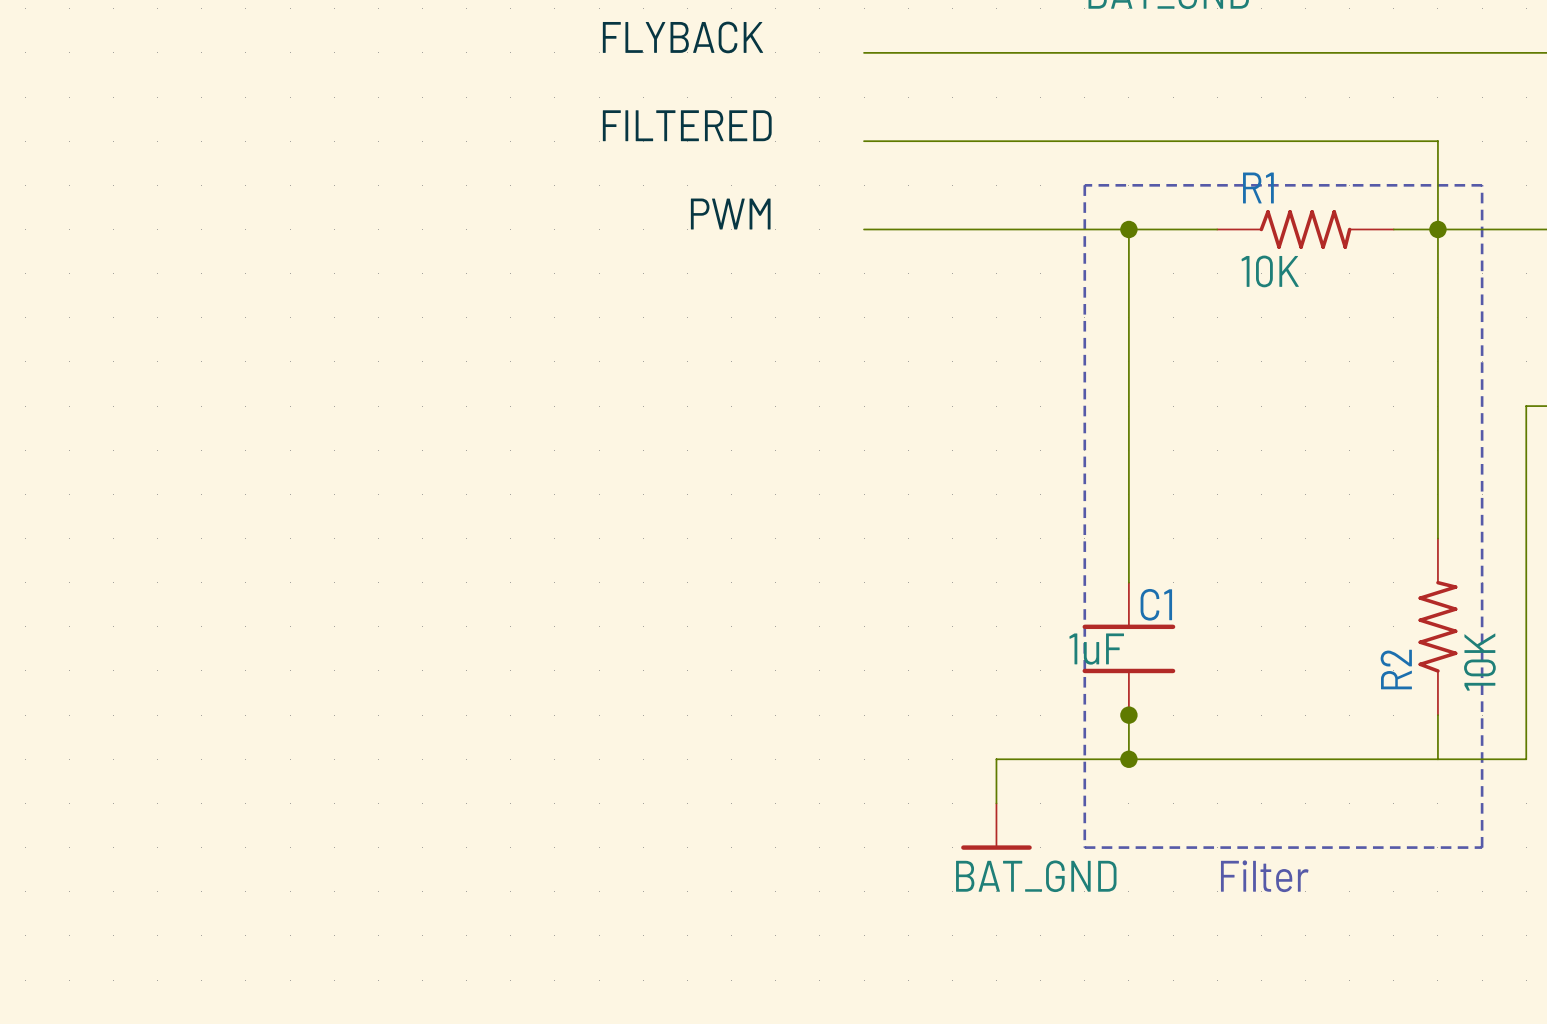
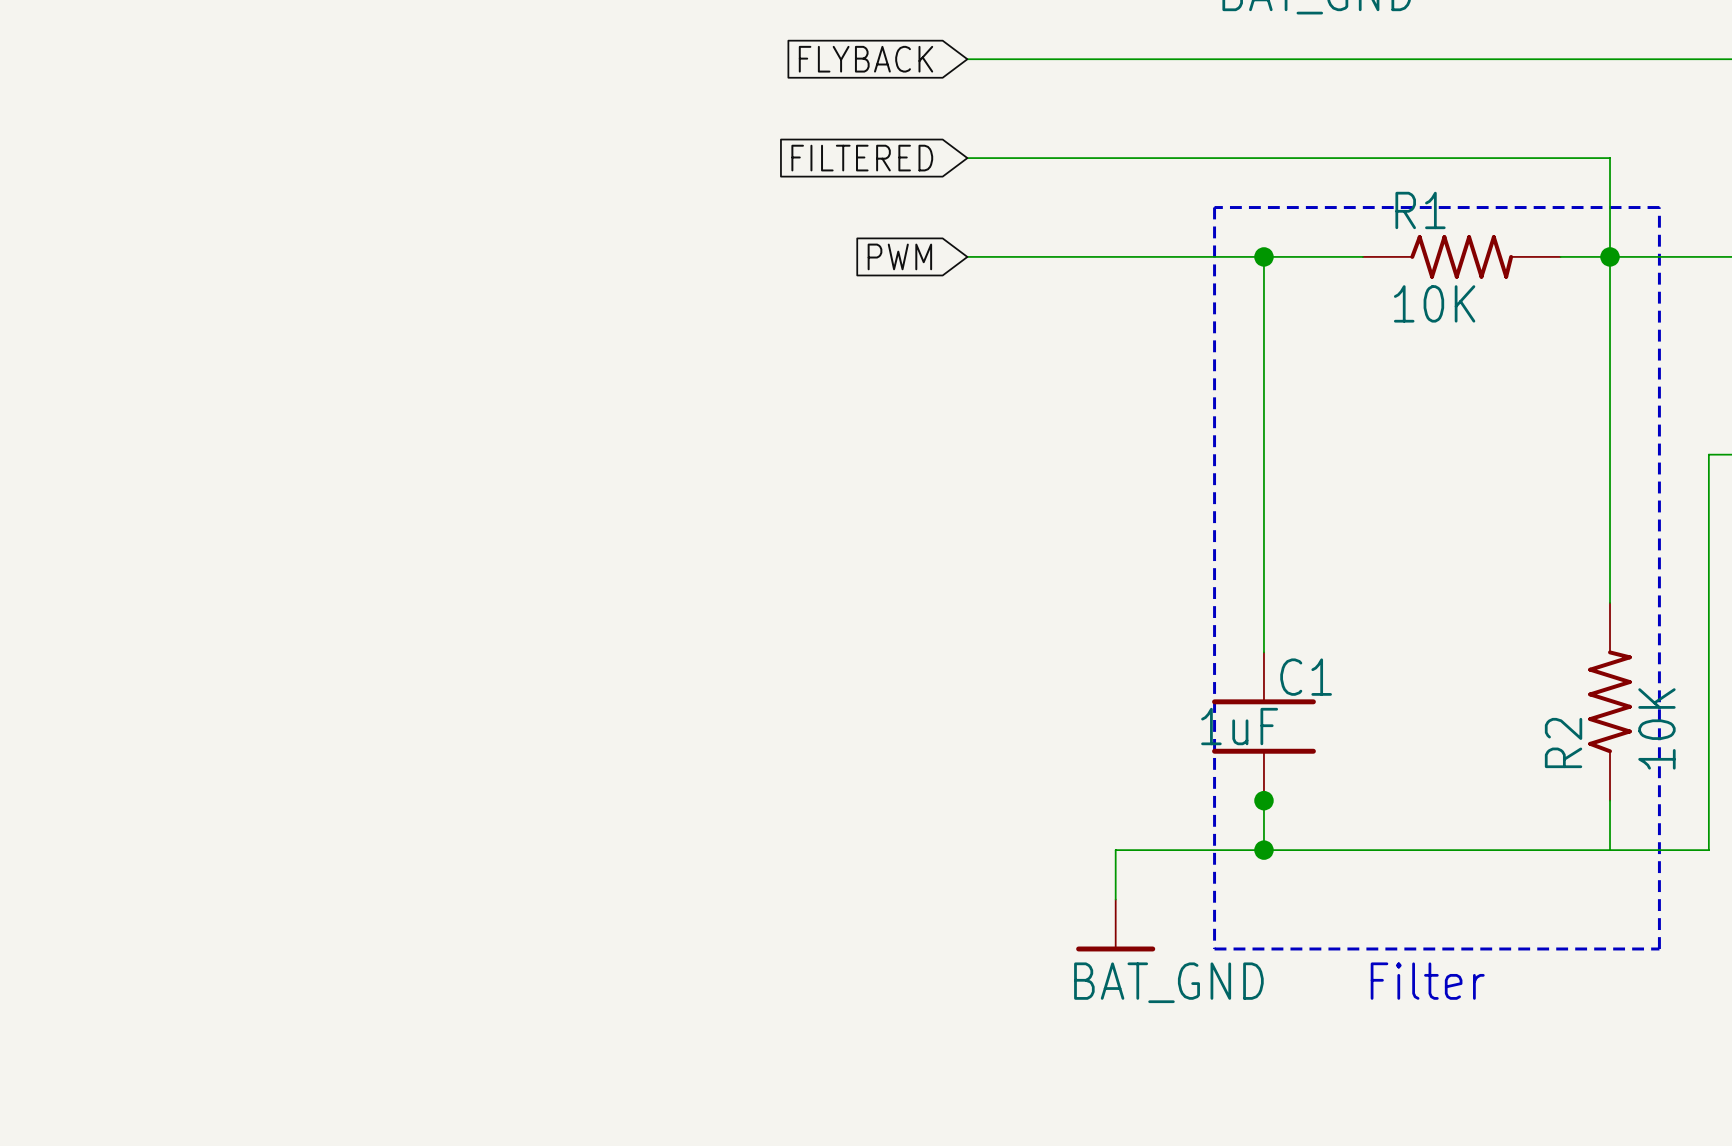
label: FLYBACK (683, 37) -> none
global label: none -> FLYBACK (865, 59)
label: FILTERED (687, 125) -> none
global label: none -> FILTERED (862, 158)
label: PWM (730, 214) -> none
global label: none -> PWM (899, 256)

